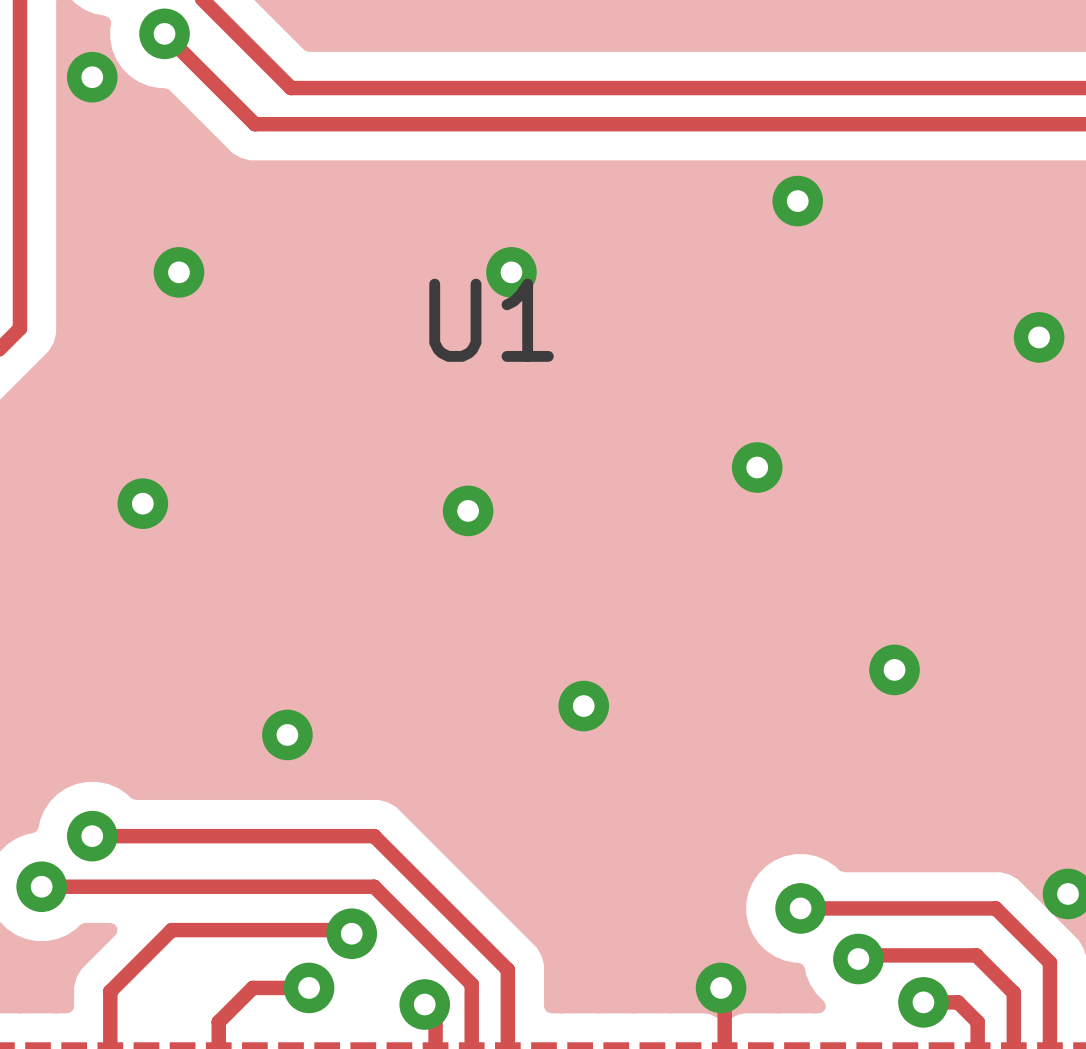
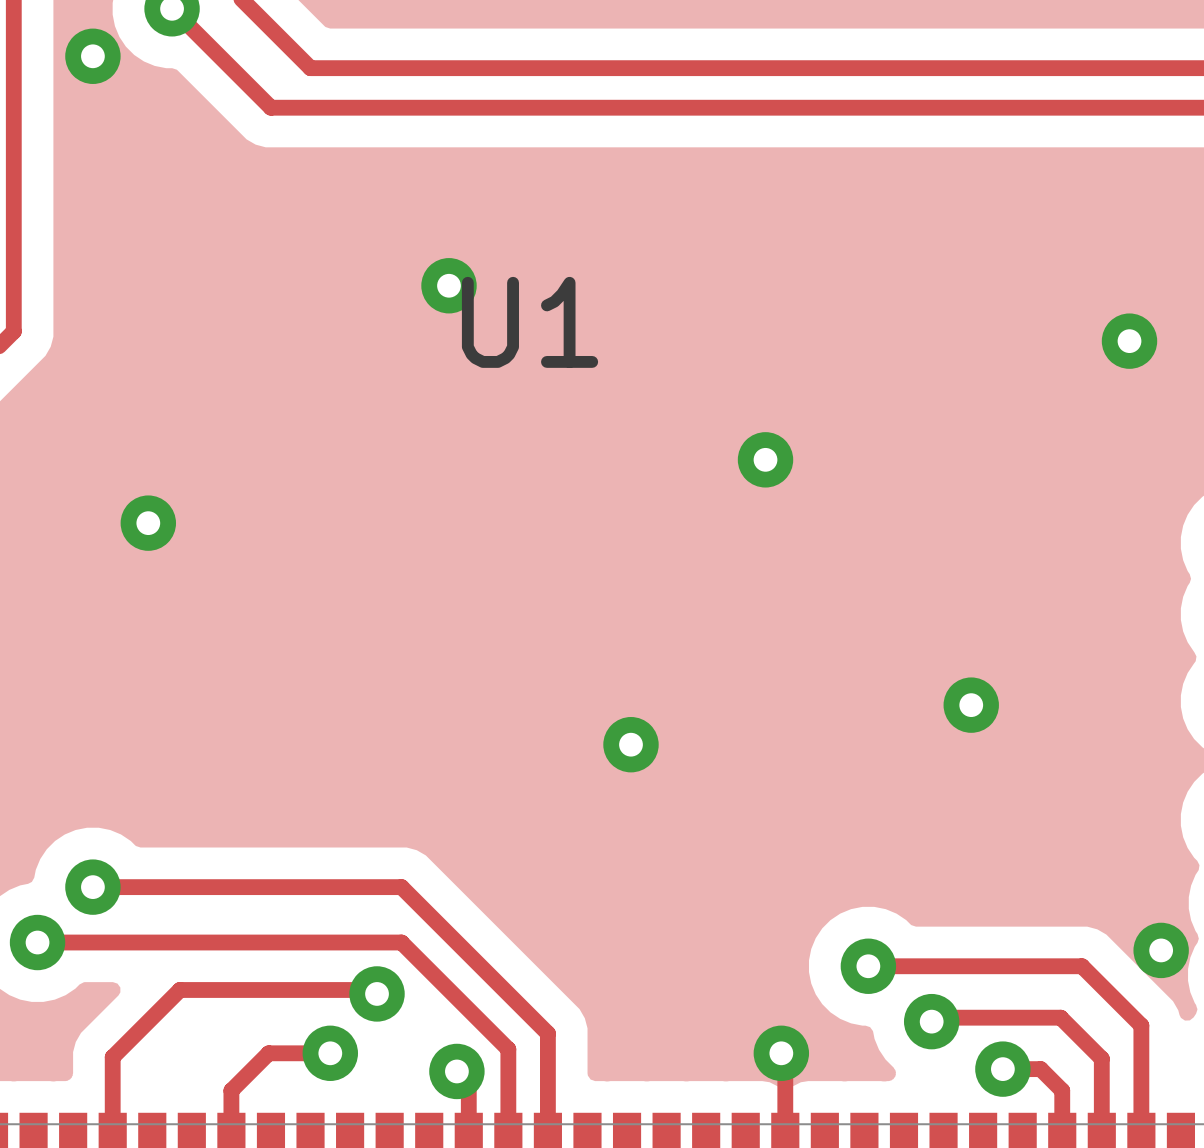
via: (797, 201) -> none
via: (178, 272) -> none
via position: (511, 272) -> (449, 285)
via position: (757, 467) -> (765, 459)
via: (468, 510) -> none
via: (287, 734) -> none

